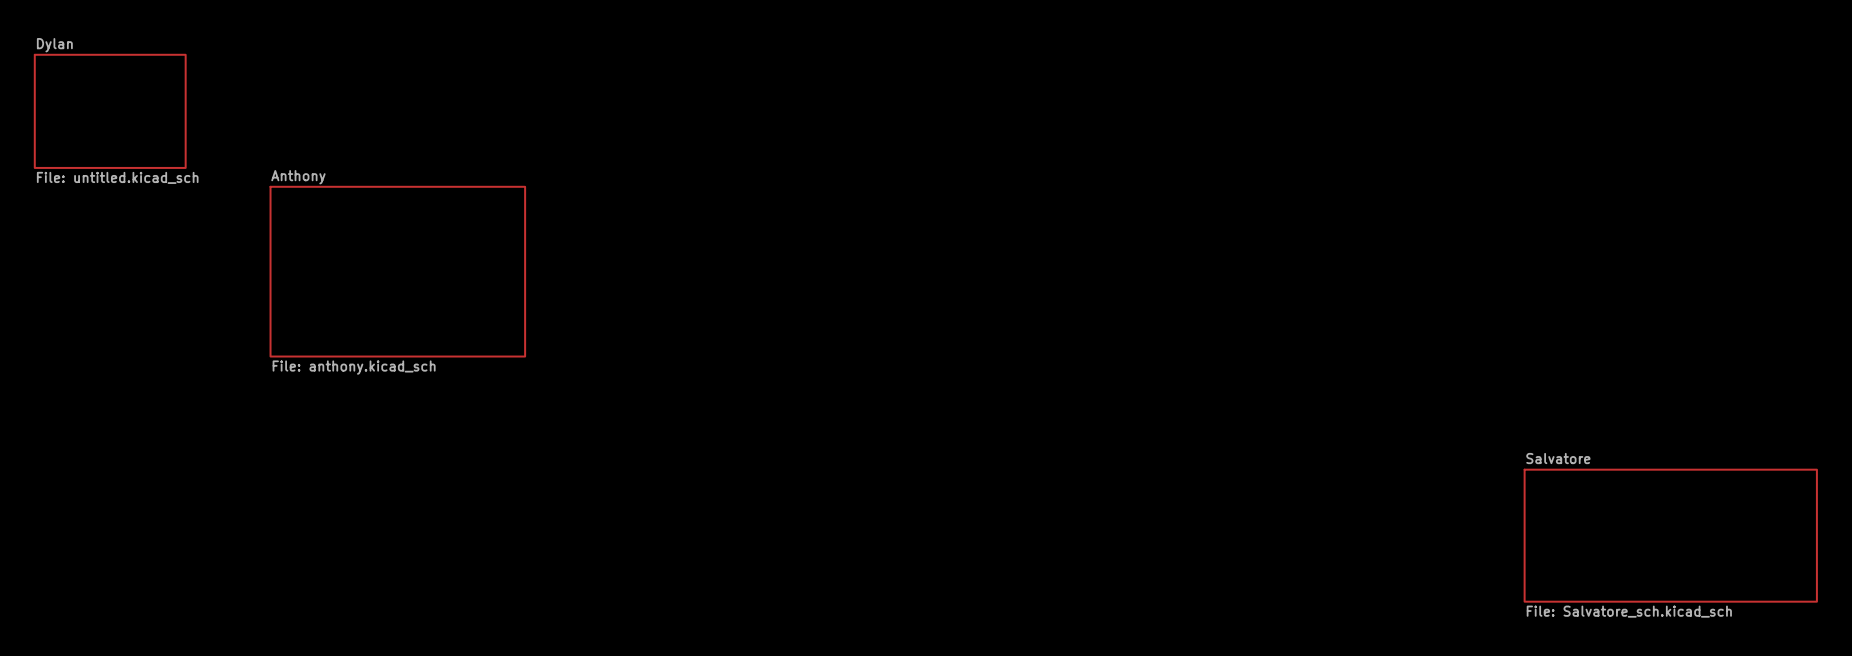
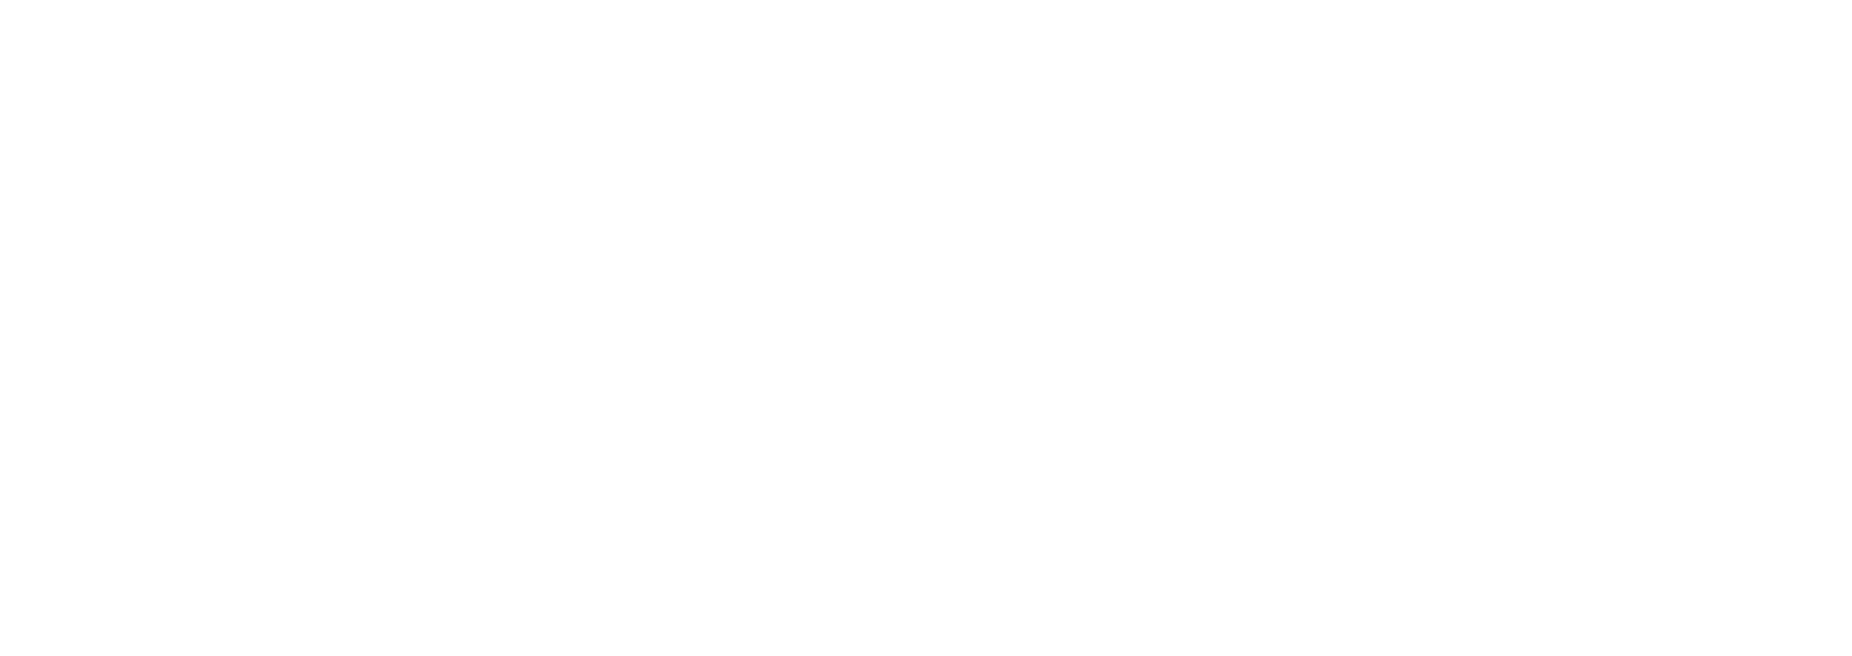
sheet Dylan: File: untitled.kicad_sch (110, 111) -> none
sheet Anthony: File: anthony.kicad_sch (397, 271) -> none
sheet Salvatore: File: Salvatore_sch.kicad_sch (1670, 535) -> none

